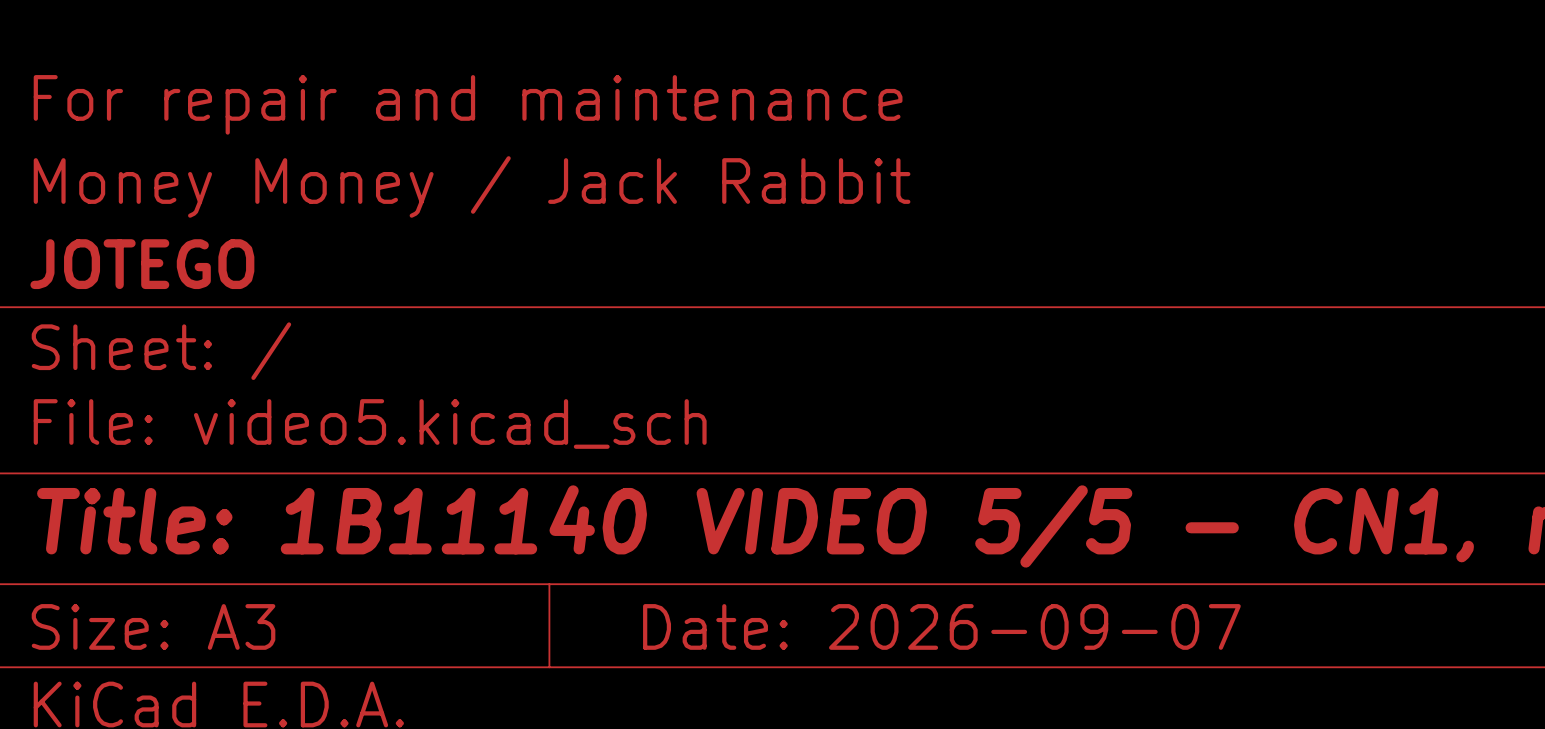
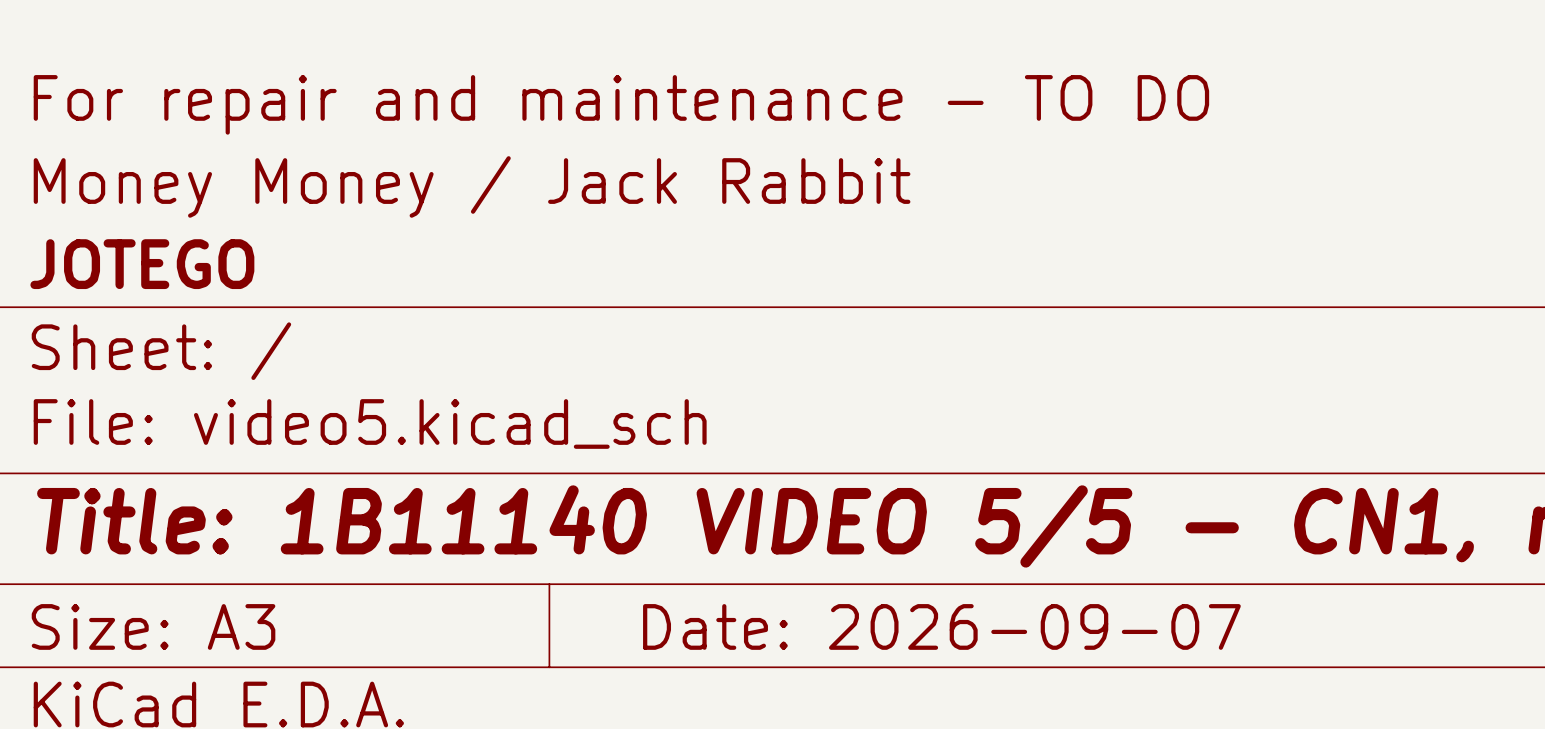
title block: For repair and maintenance (468, 104) -> For repair and maintenance - TO DO (621, 104)

